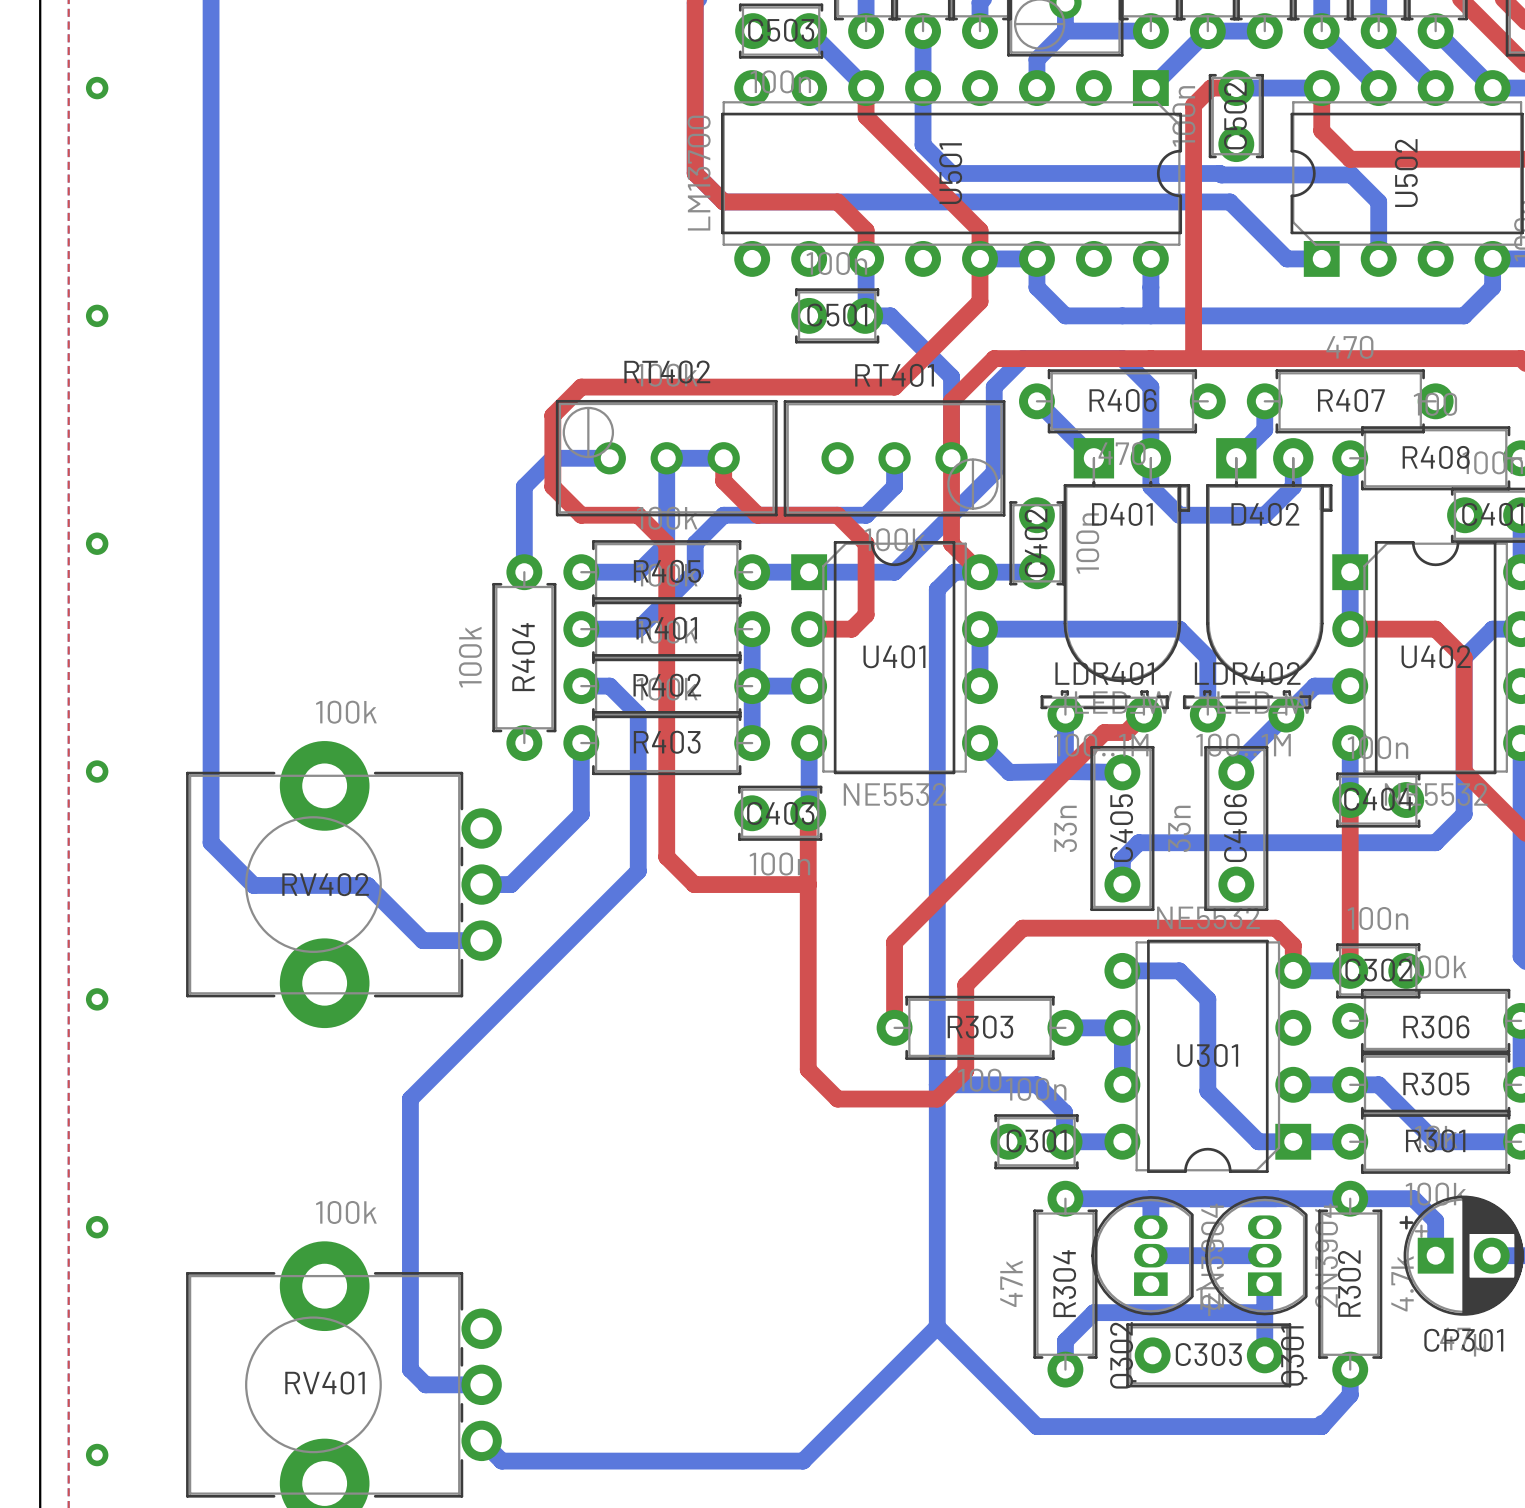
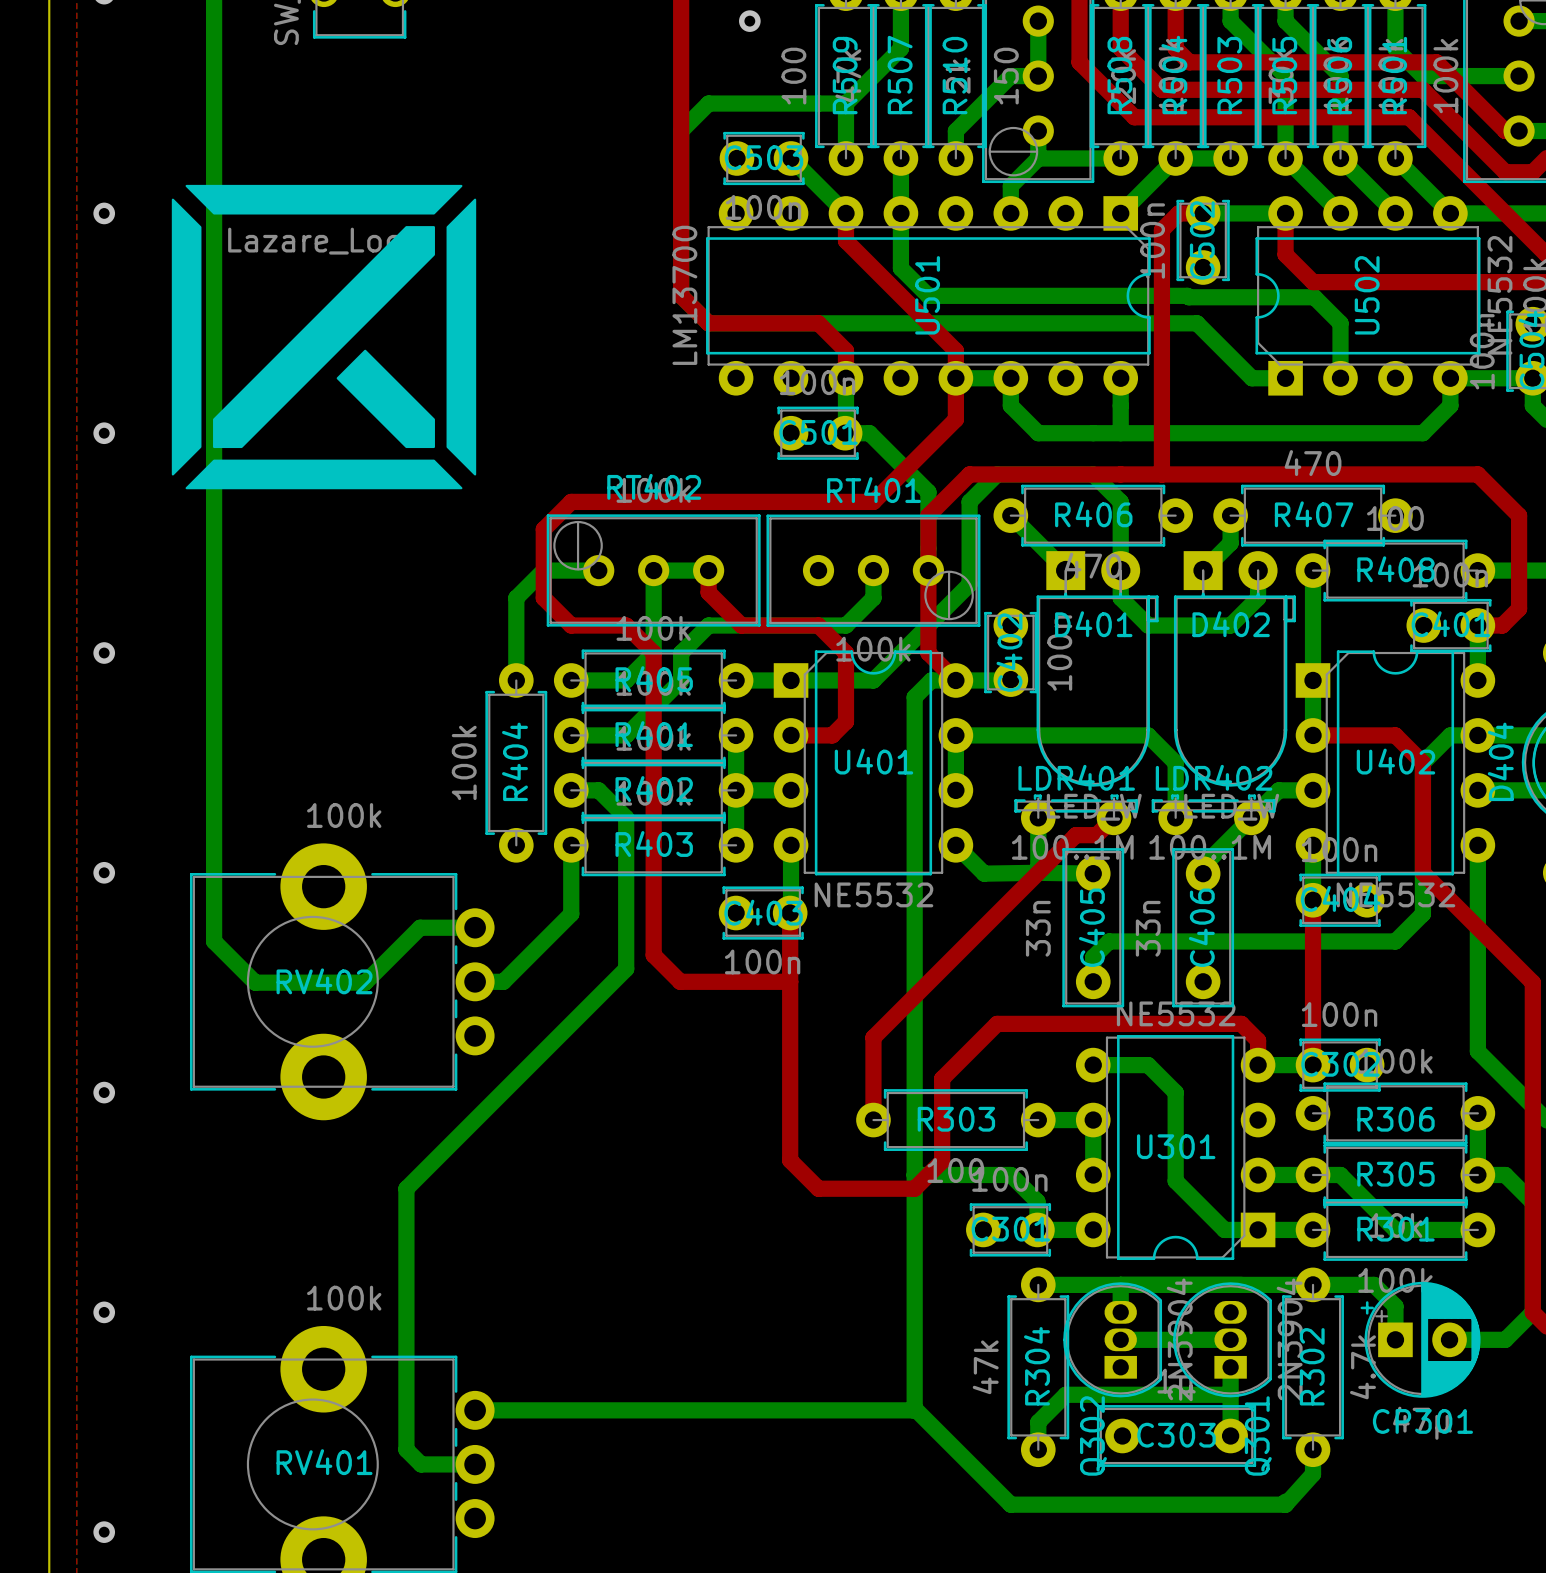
drawing: none -> [171, 184, 477, 490]
bottom track: (367, 885) (422, 940) (481, 940) -> (365, 982) (420, 927) (475, 927)
bottom track: (935, 1328) (803, 1461) (501, 1461) (481, 1440) -> (912, 1410) (475, 1410)

